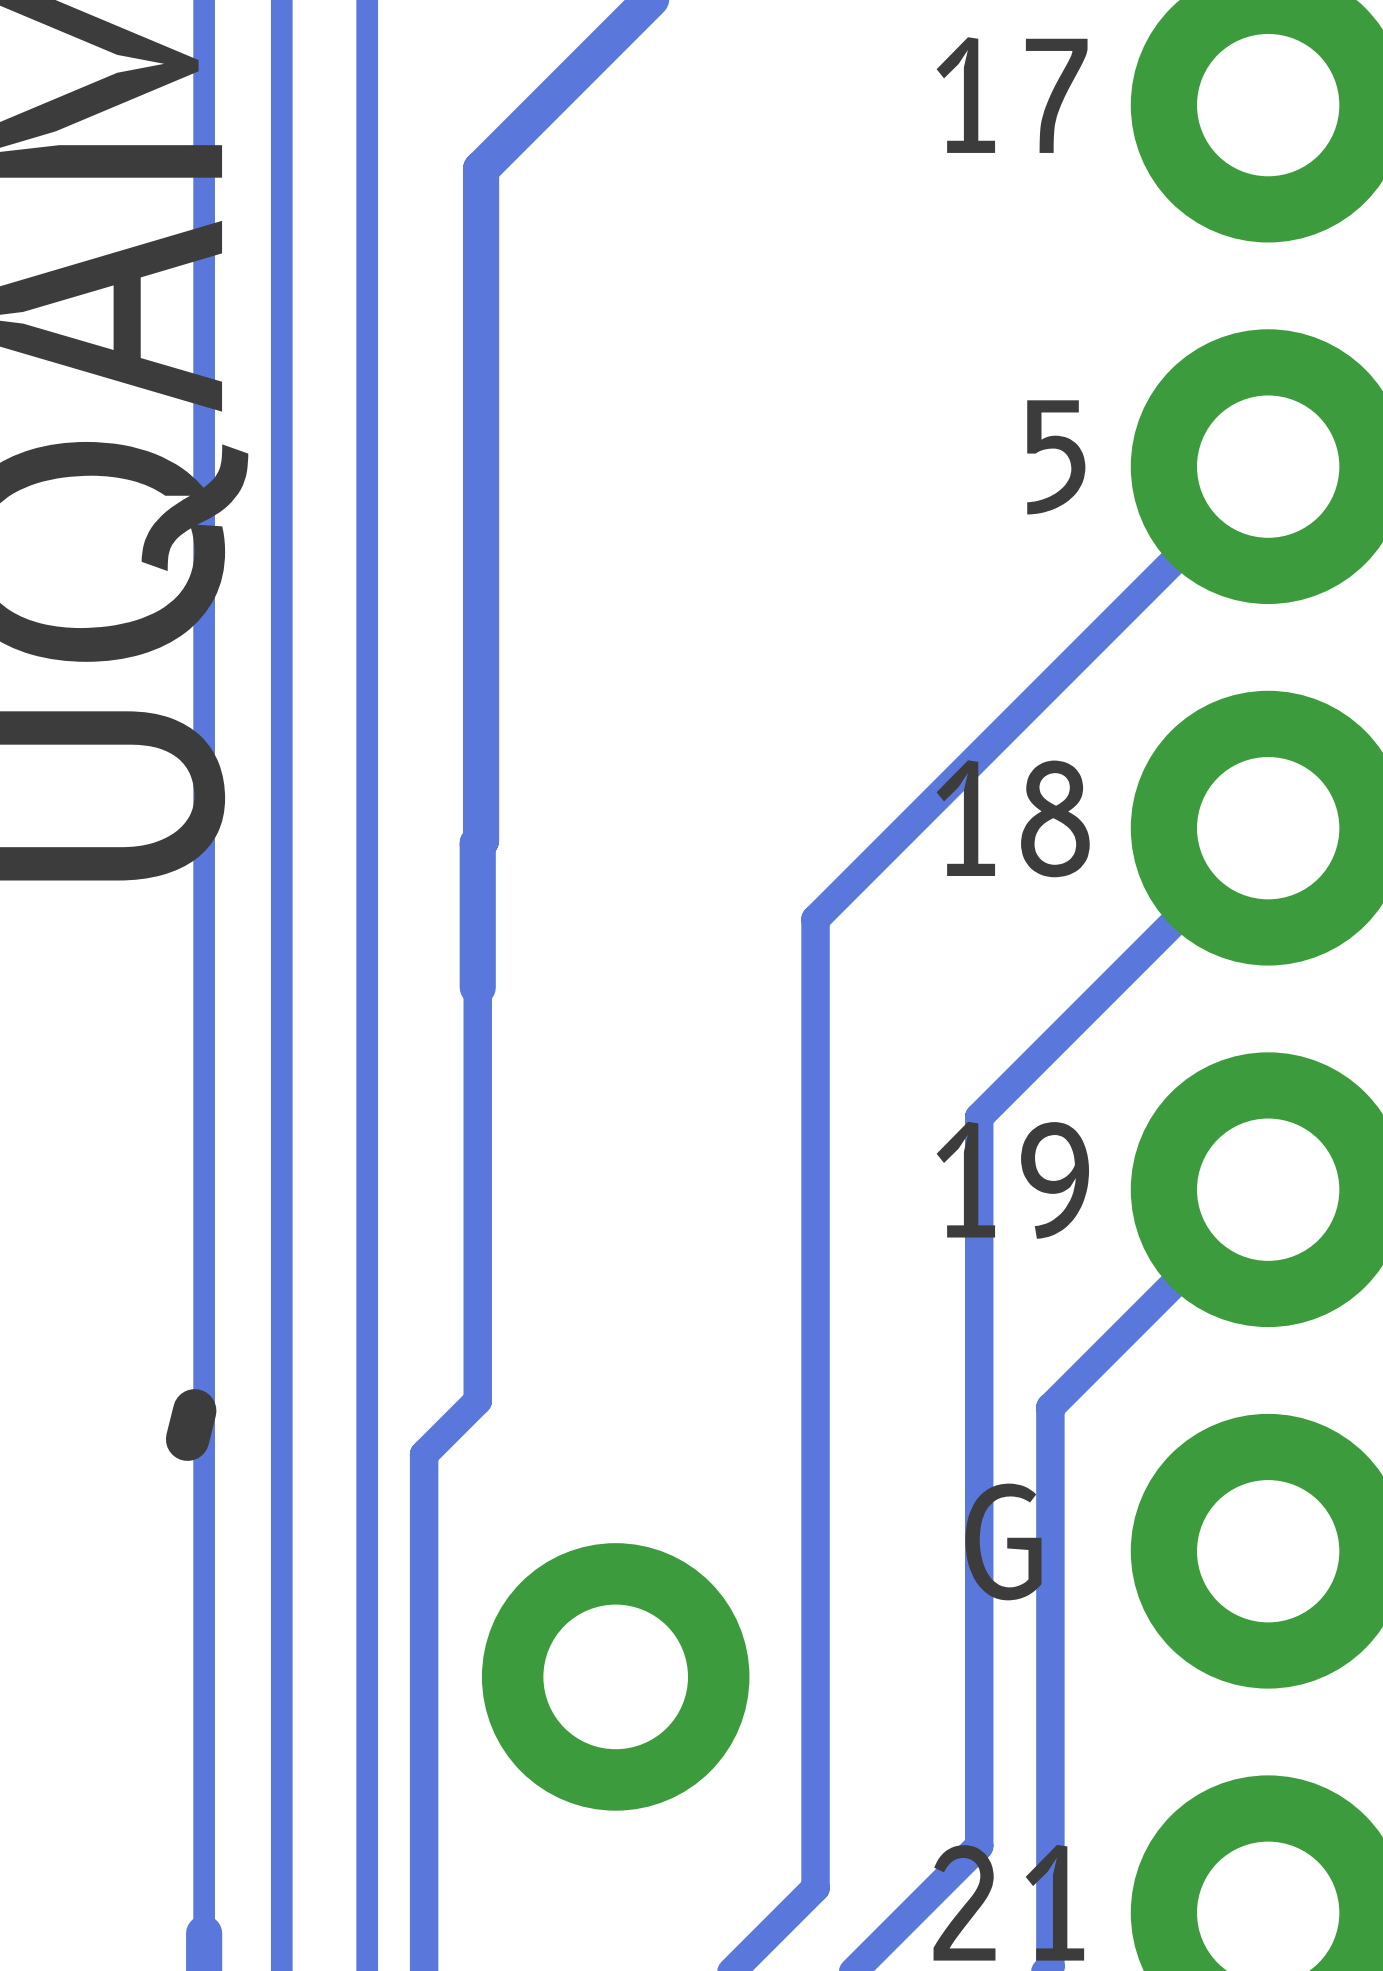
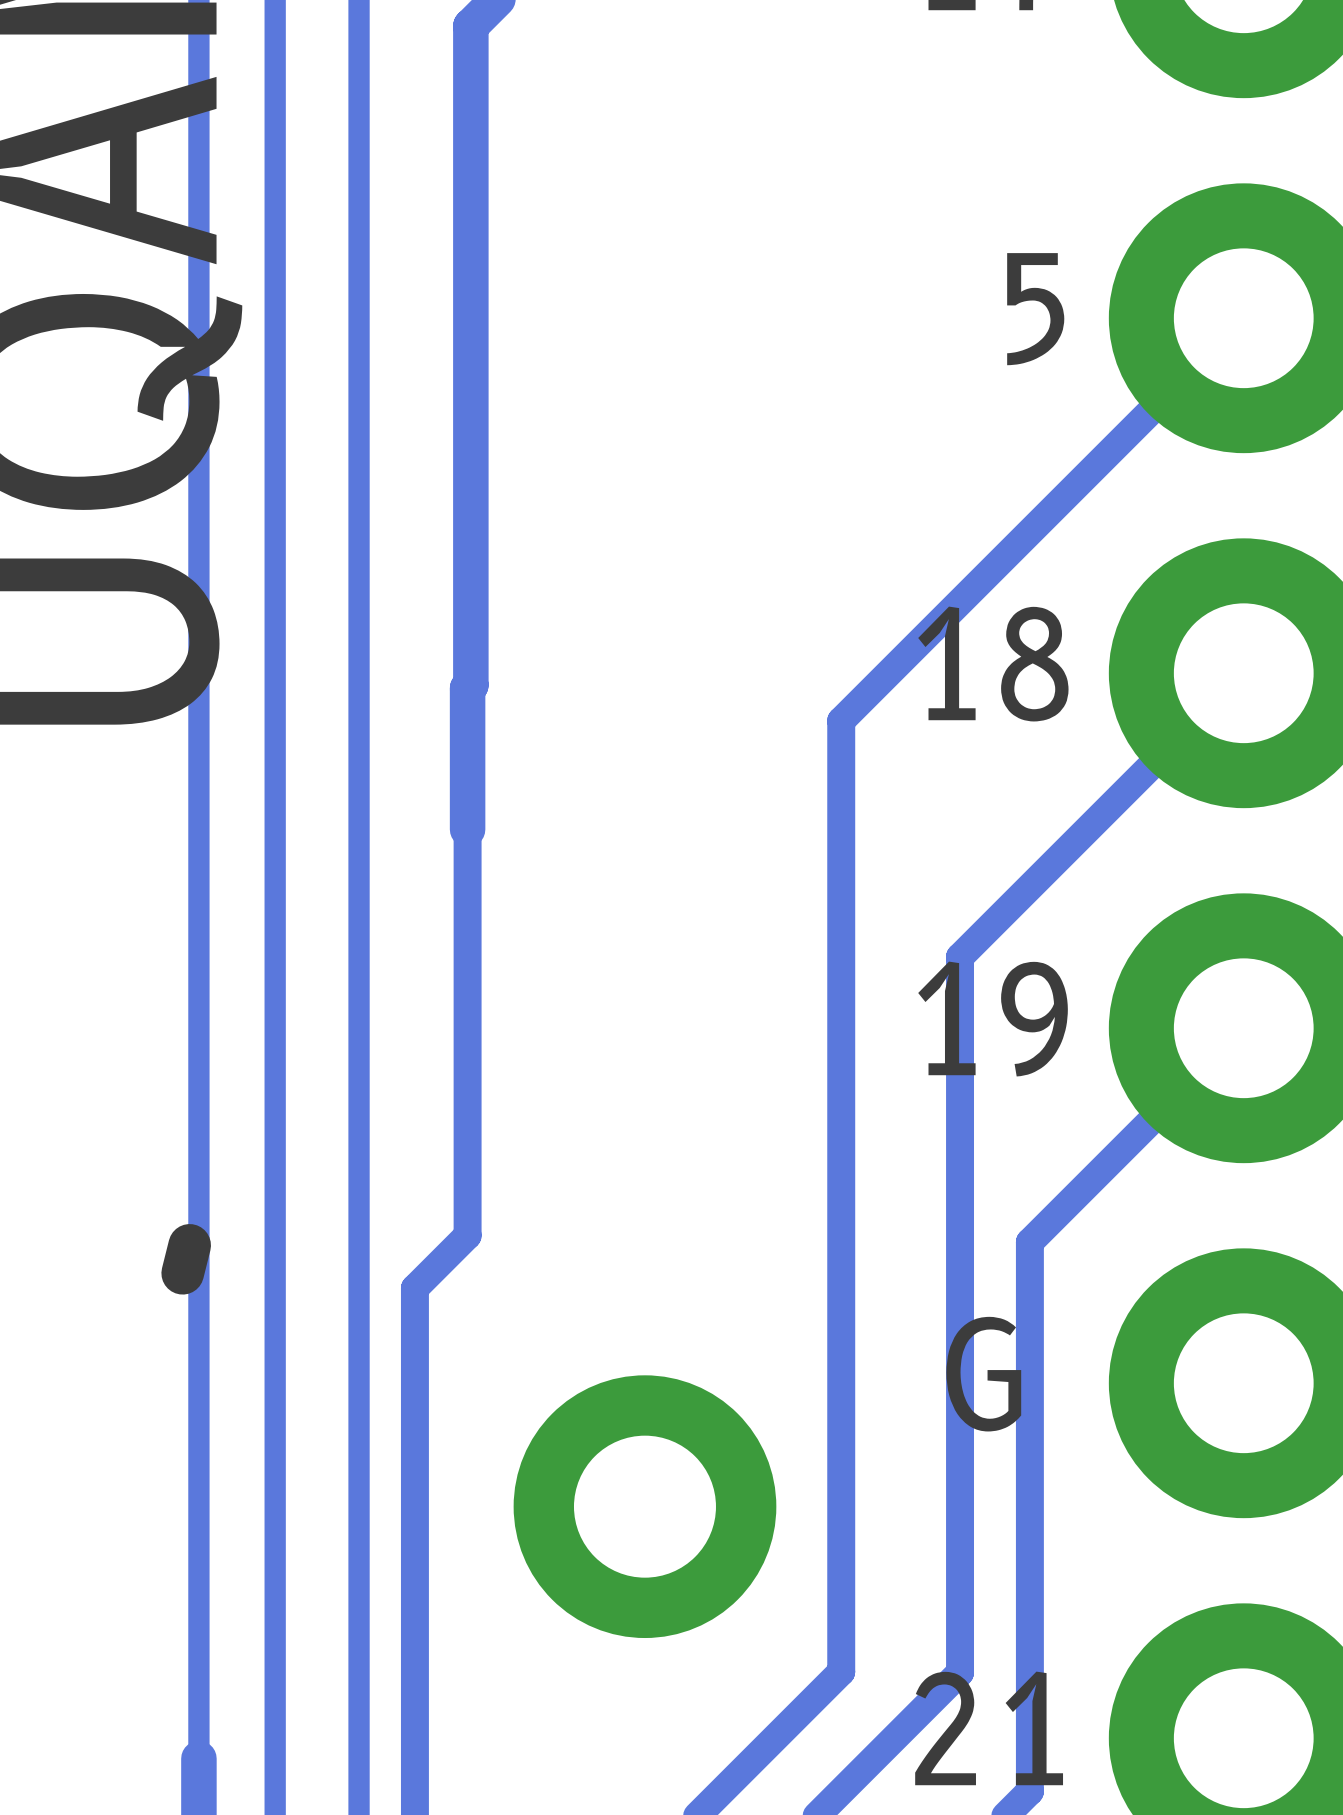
track: (858, 876) (815, 919) (815, 1887) -> (841, 720) (841, 1671) (799, 1713)
part position: (615, 1676) -> (644, 1506)

